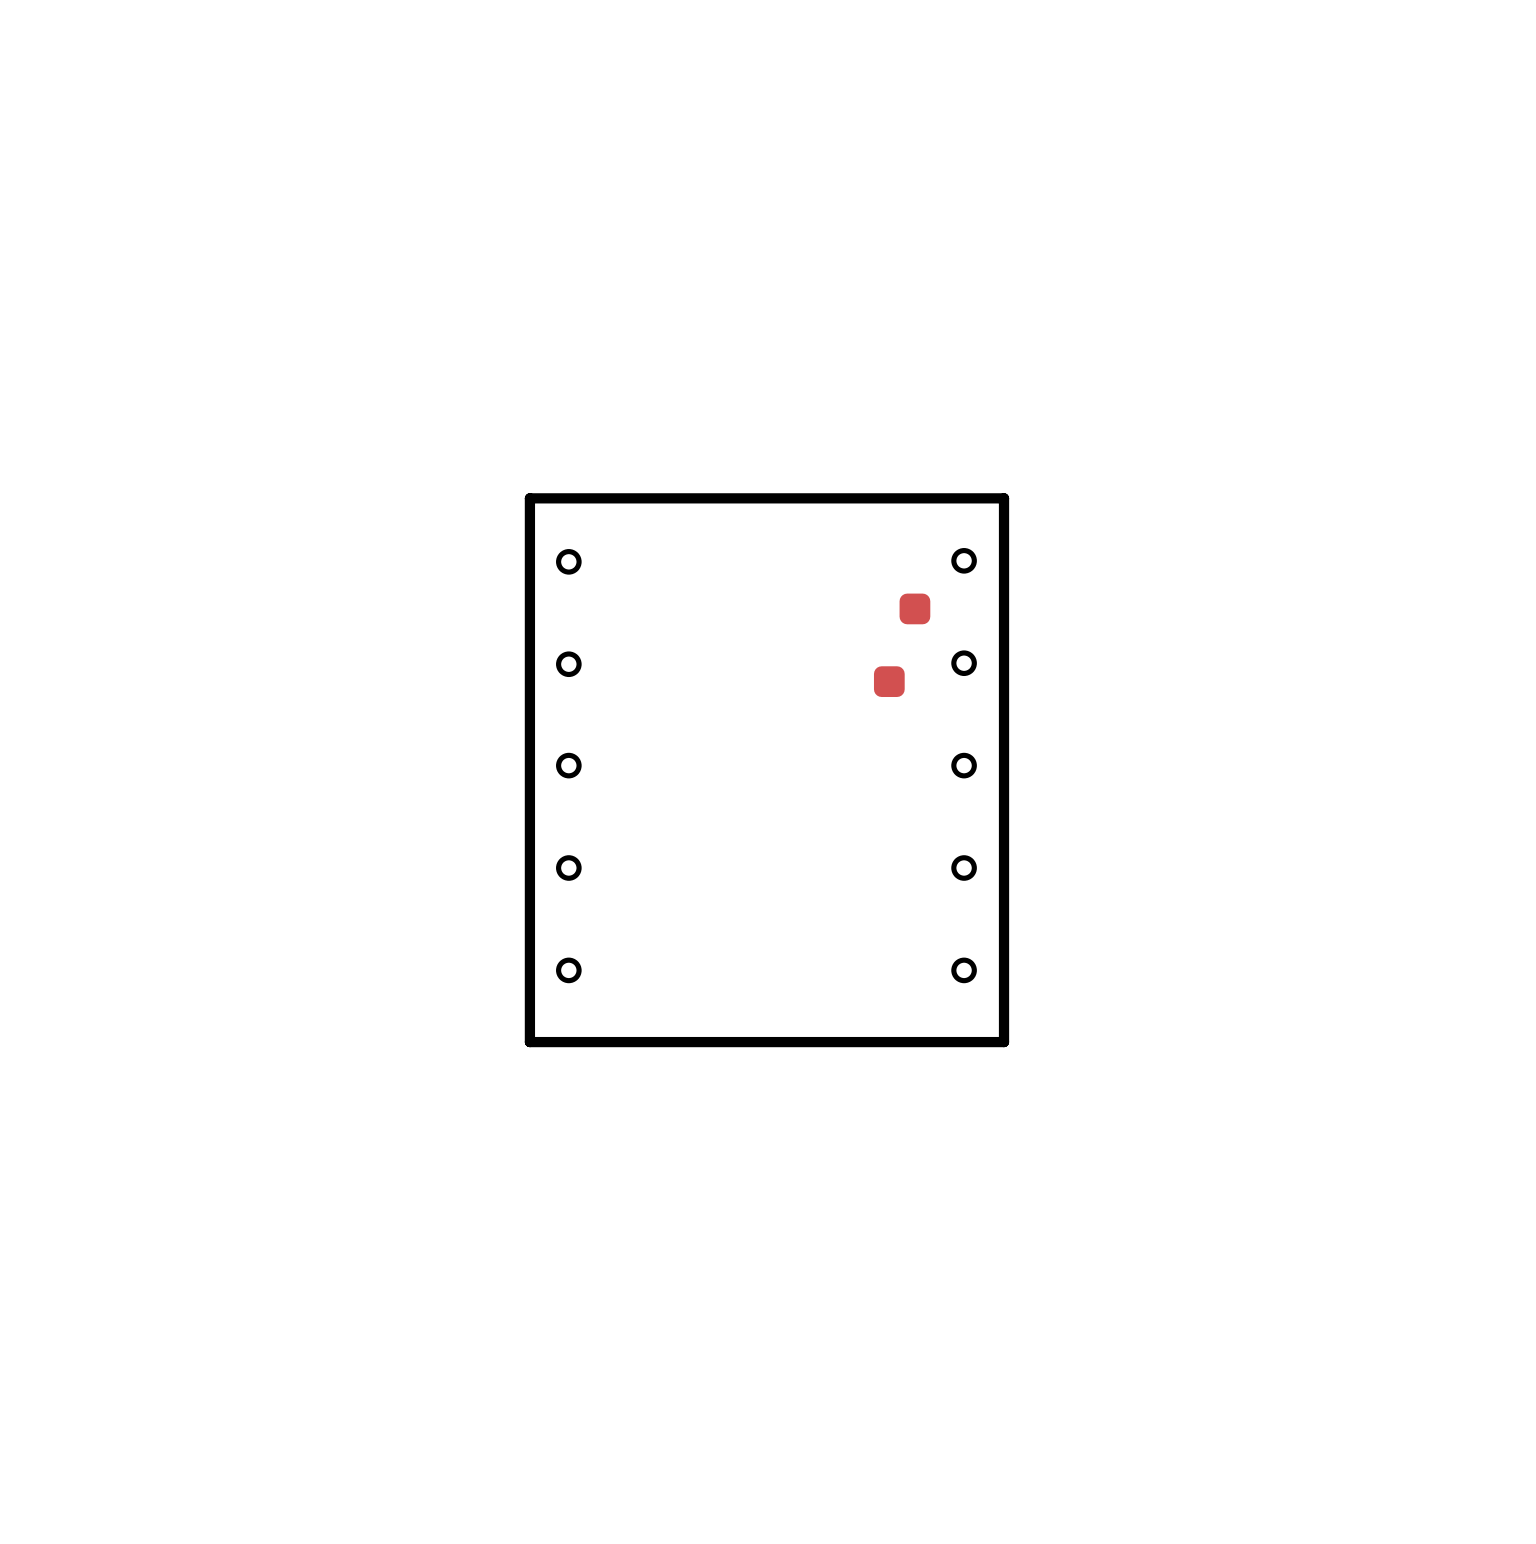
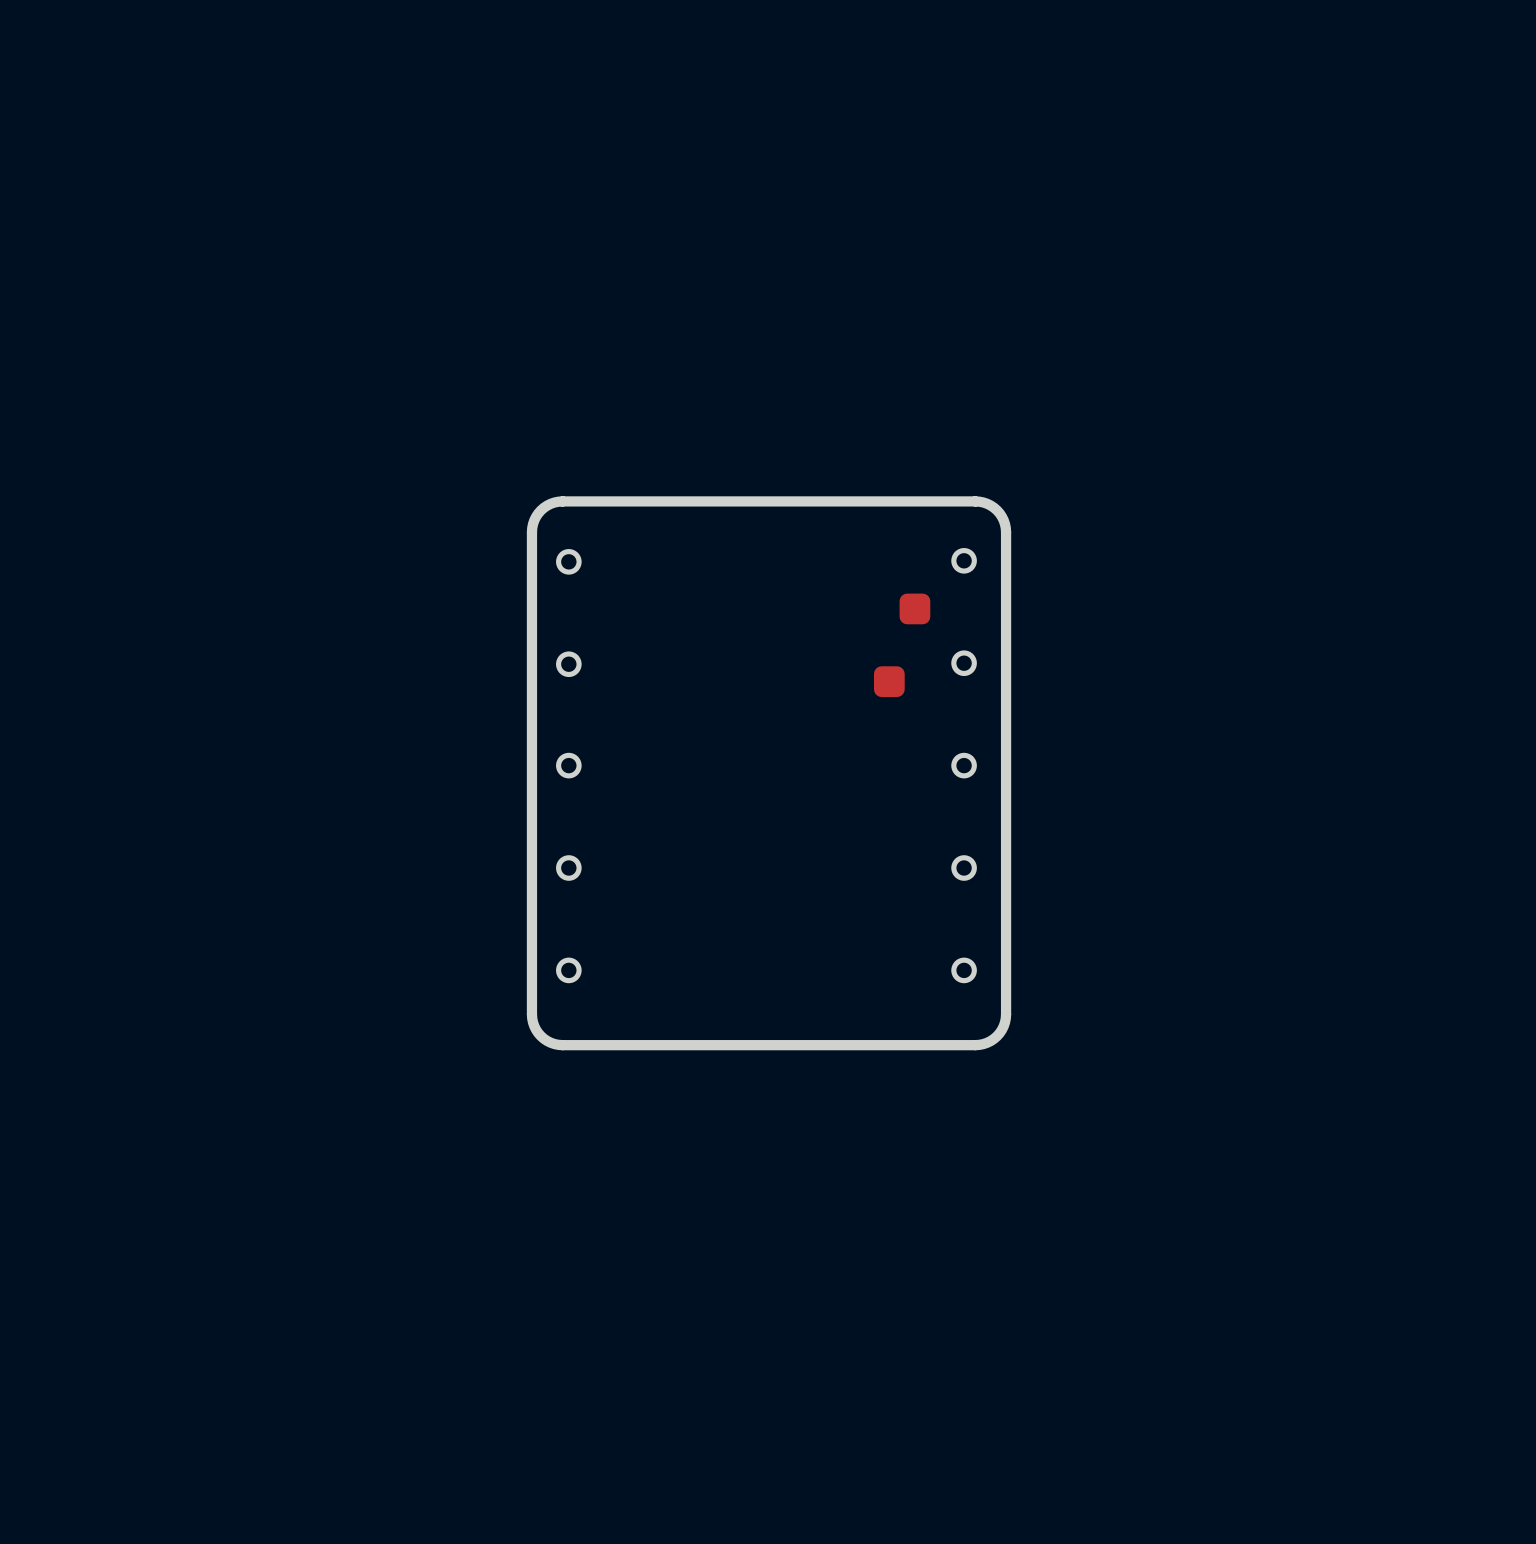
board edge: (529, 498) (1004, 498) (1004, 1042) (529, 1042) (529, 498) -> (562, 501) (550, 503) (540, 510) (534, 520) (531, 532) (531, 1014) (534, 1026) (538, 1033) (550, 1042) (562, 1045) (975, 1045) (987, 1042) (994, 1038) (1003, 1026) (1006, 1014) (1006, 532) (1003, 520) (999, 513) (987, 503) (975, 501) (562, 501)

